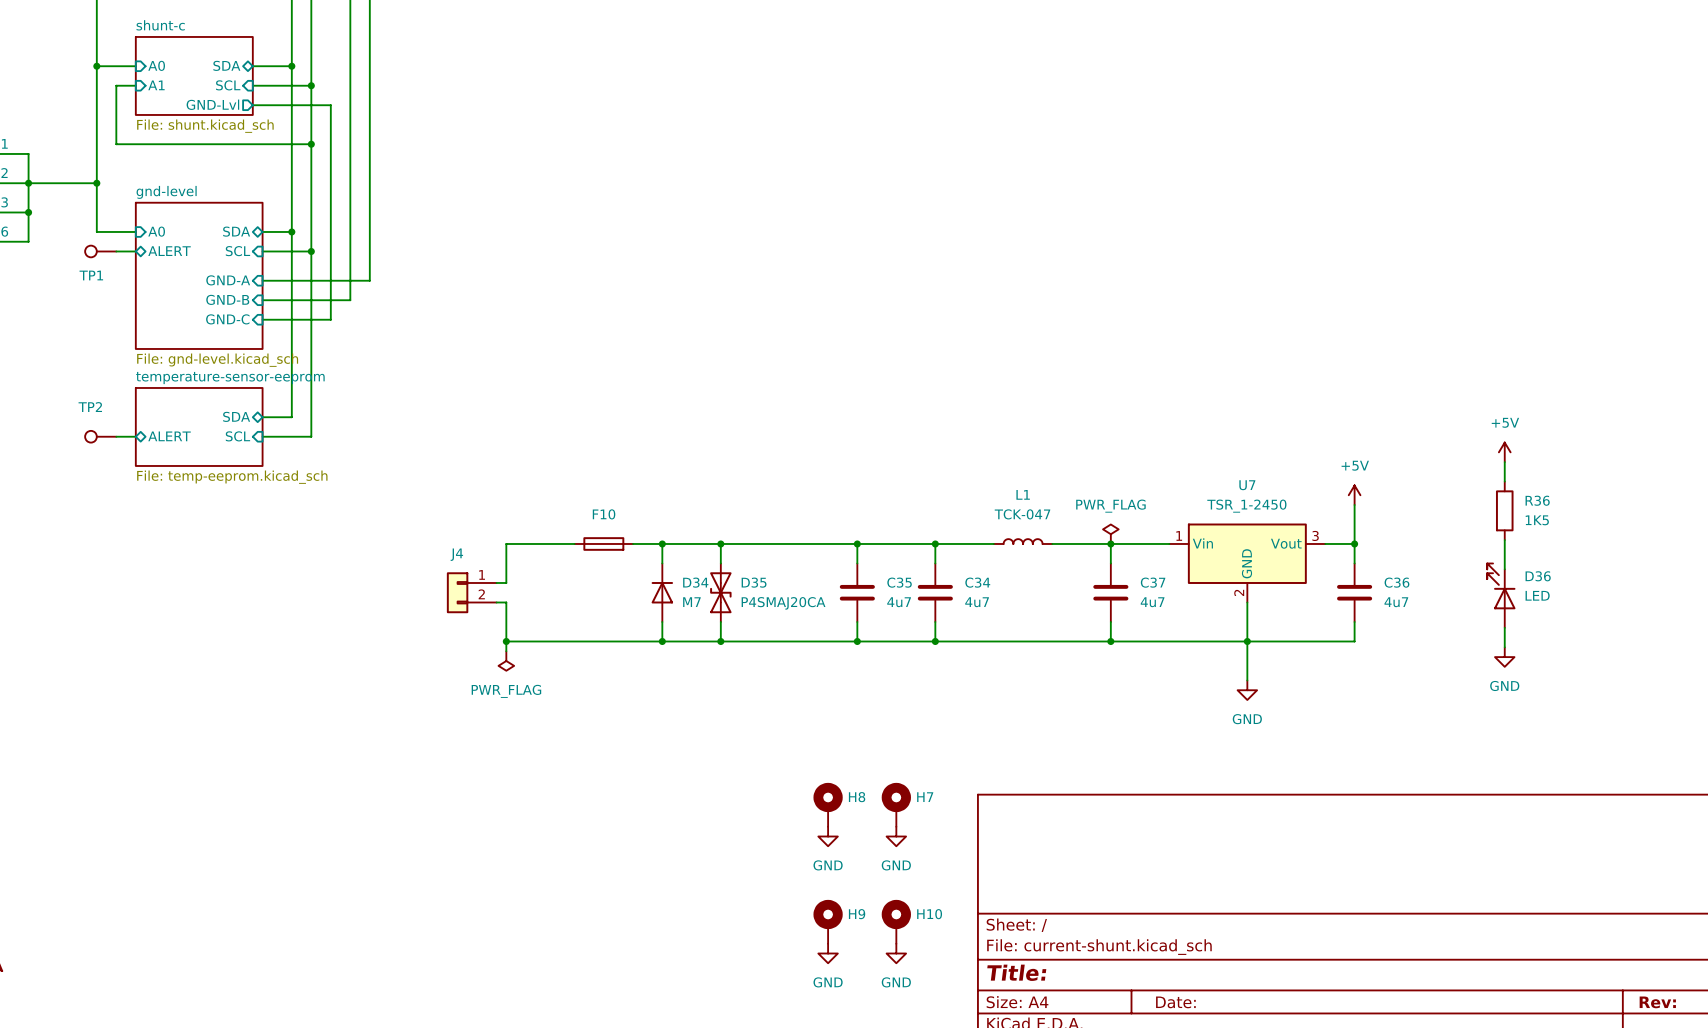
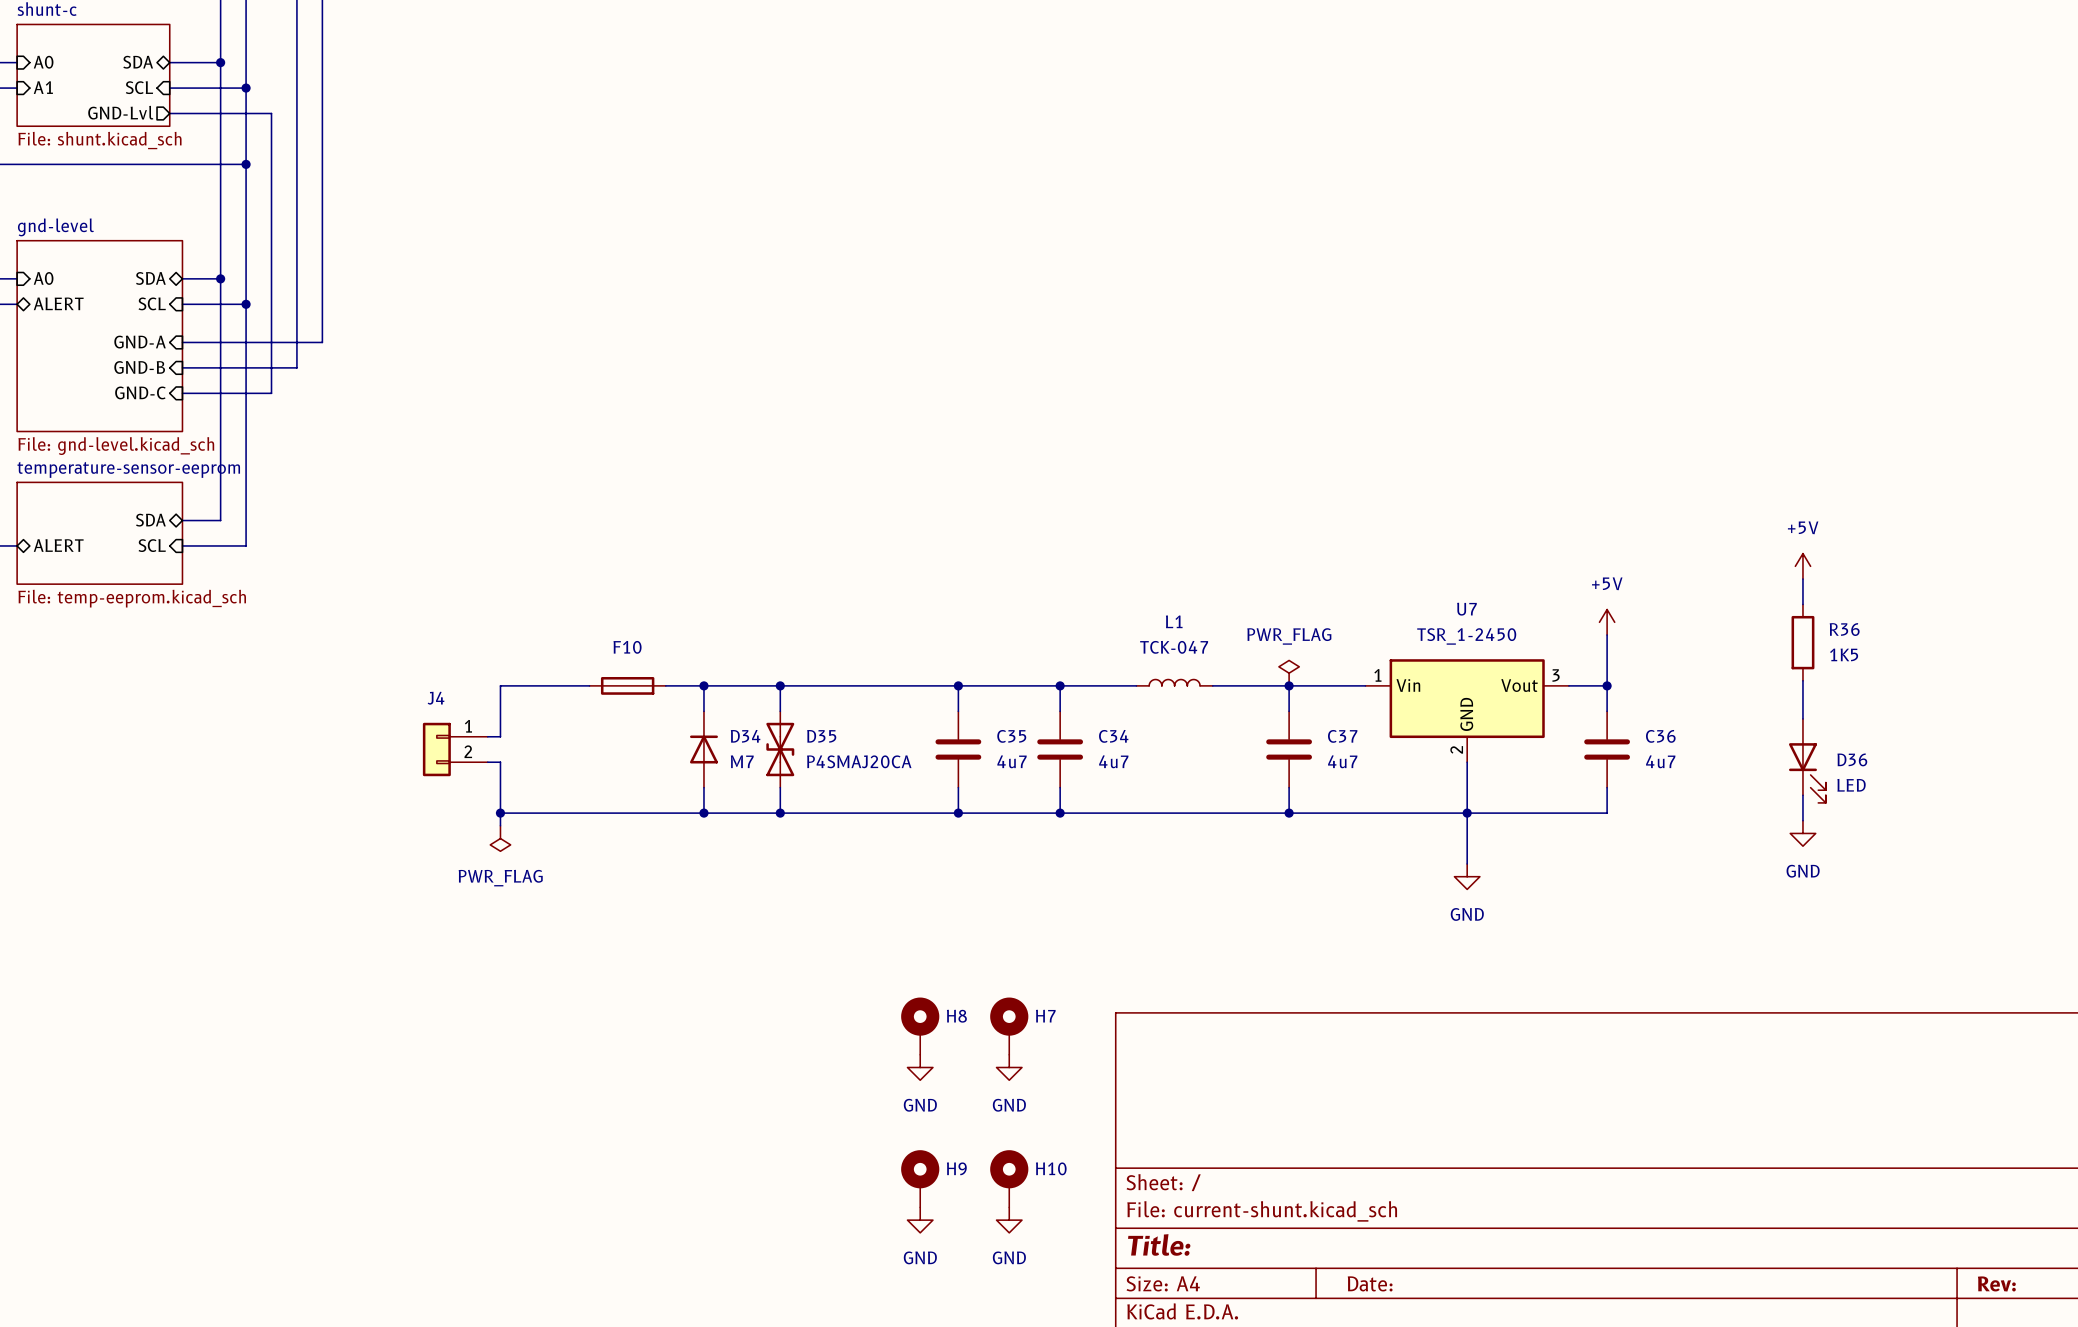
D36 name position: D36 (1538, 576) -> D36 (1852, 759)
D36 rotation: 0° (1501, 586) -> 180° (1807, 773)
D36 value position: LED (1537, 595) -> LED (1851, 785)

